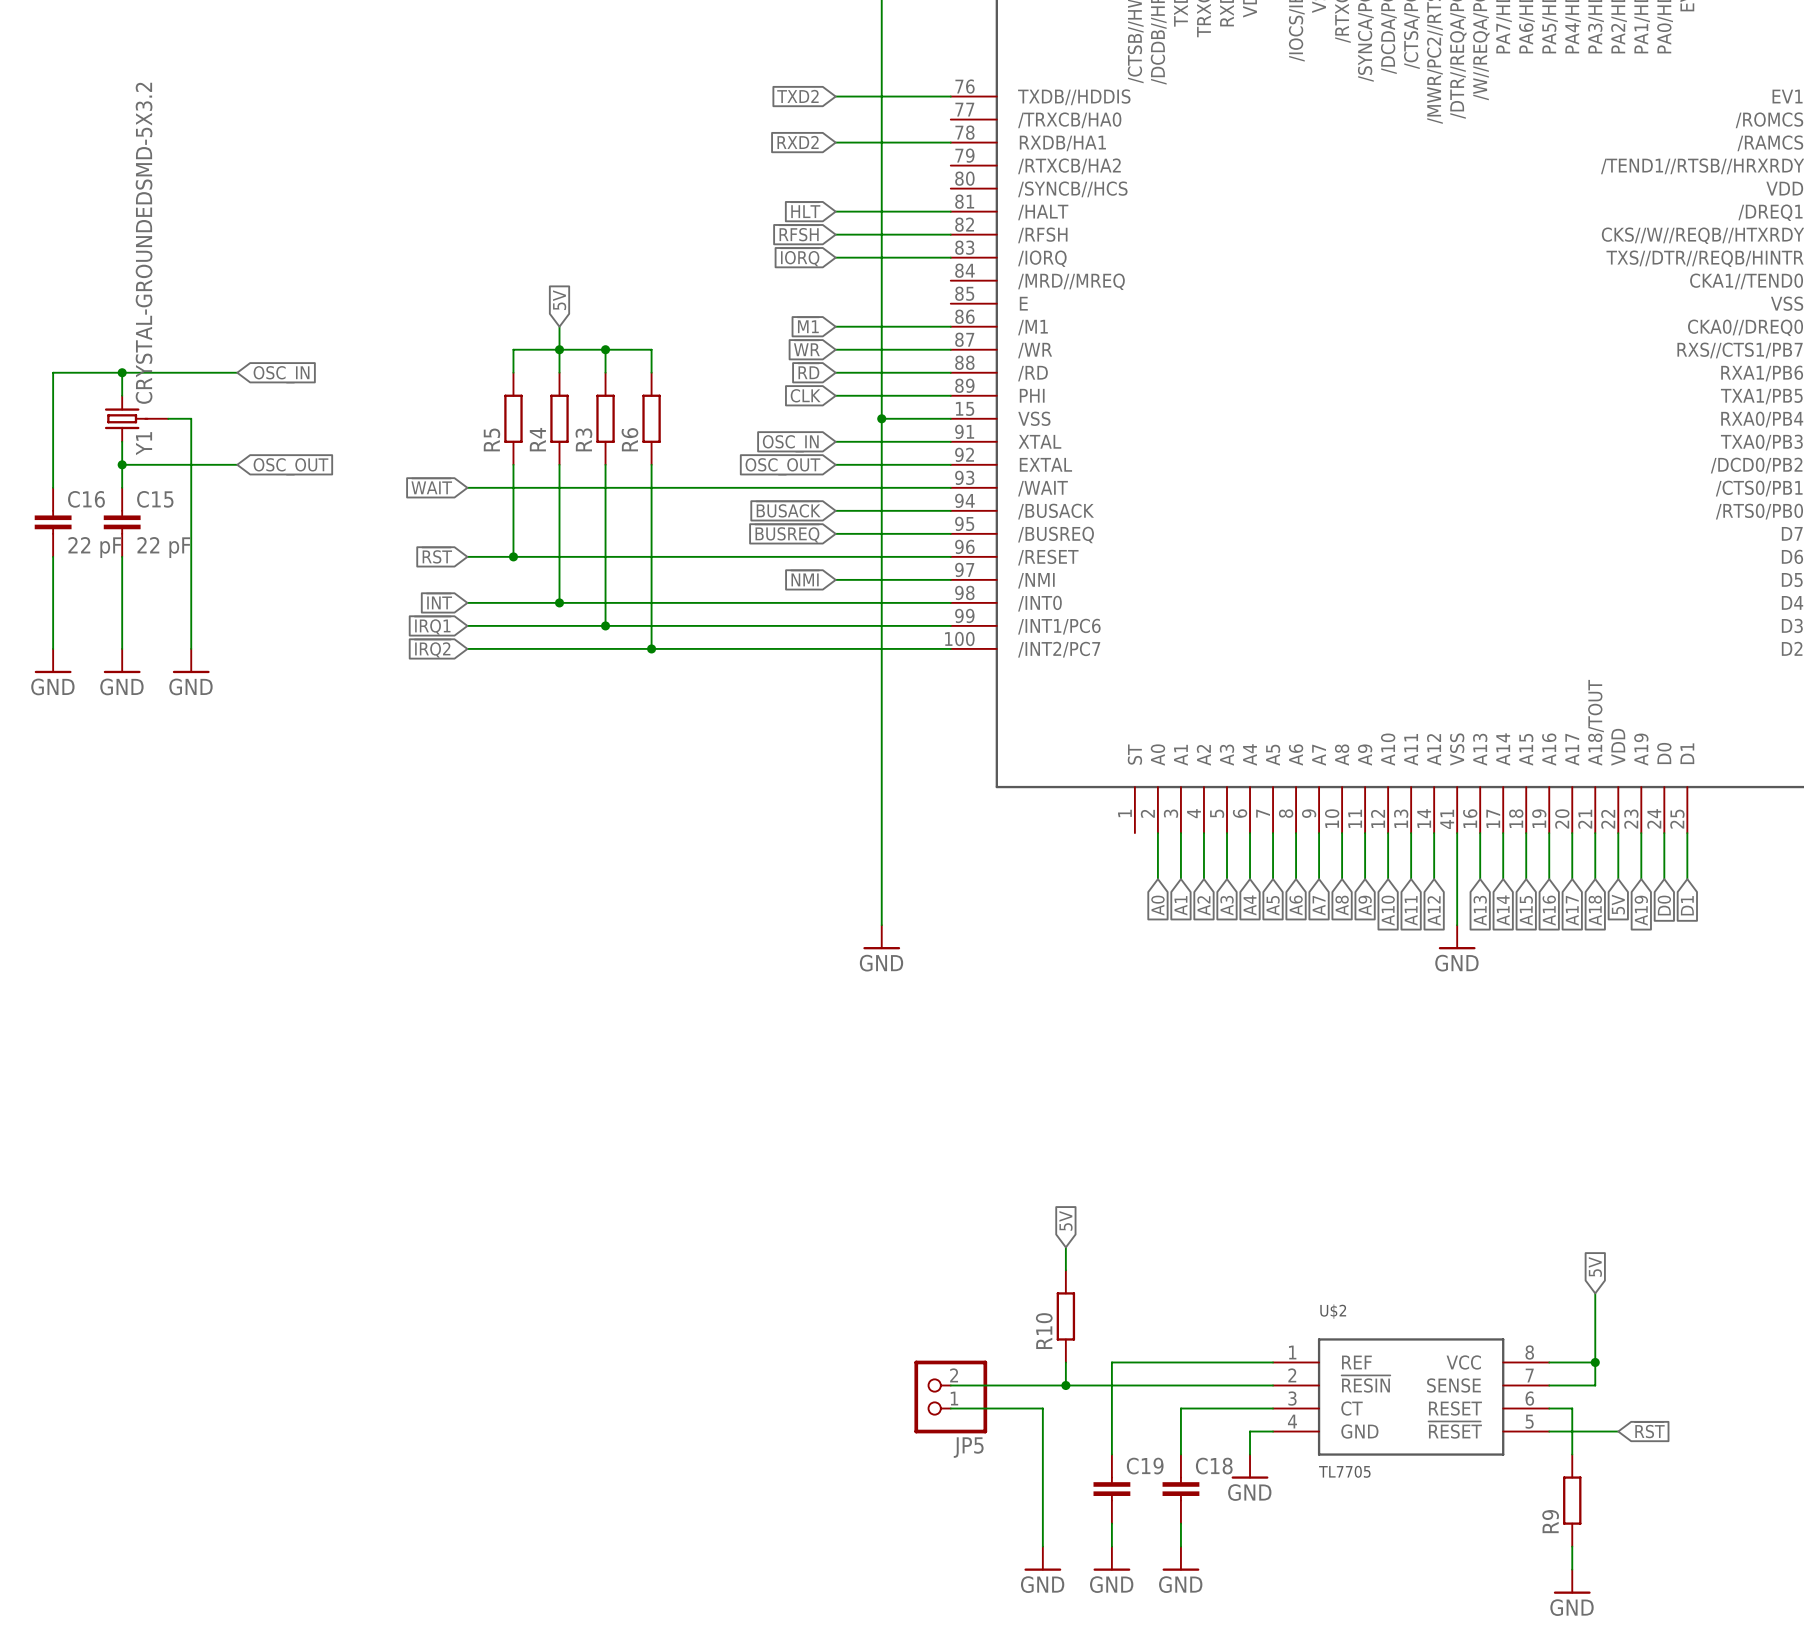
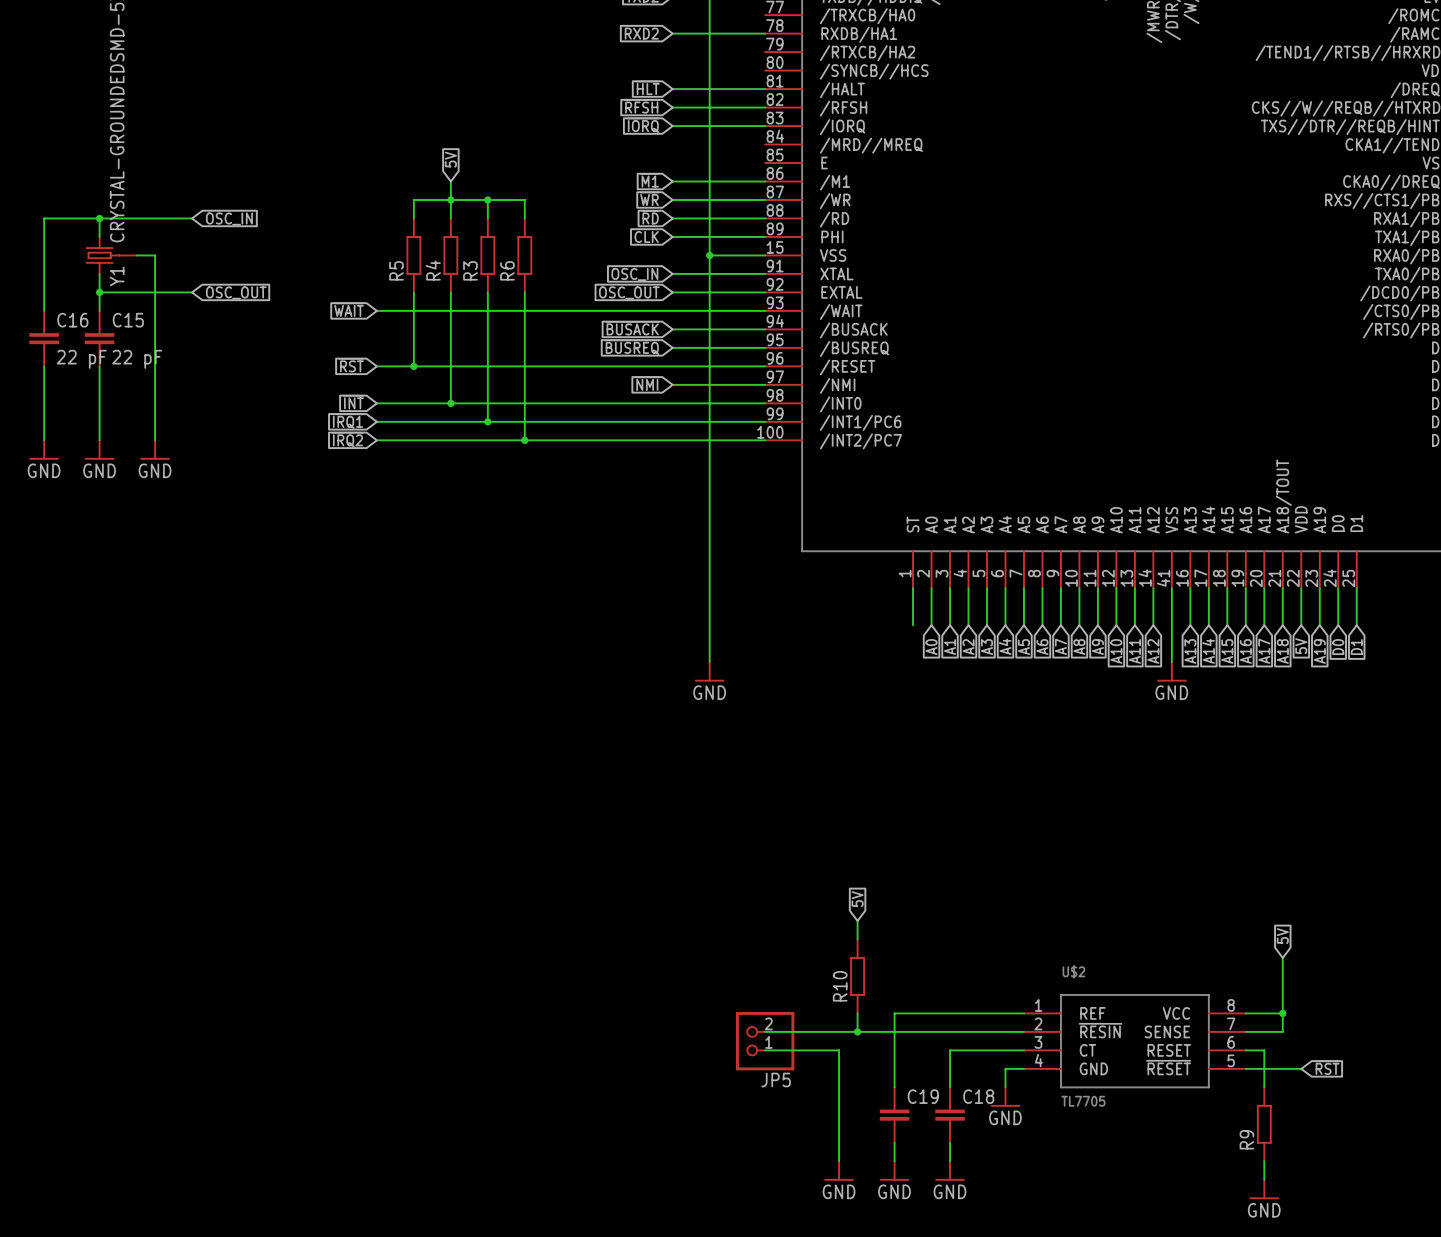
wire: none -> (913, 588) (913, 625)

